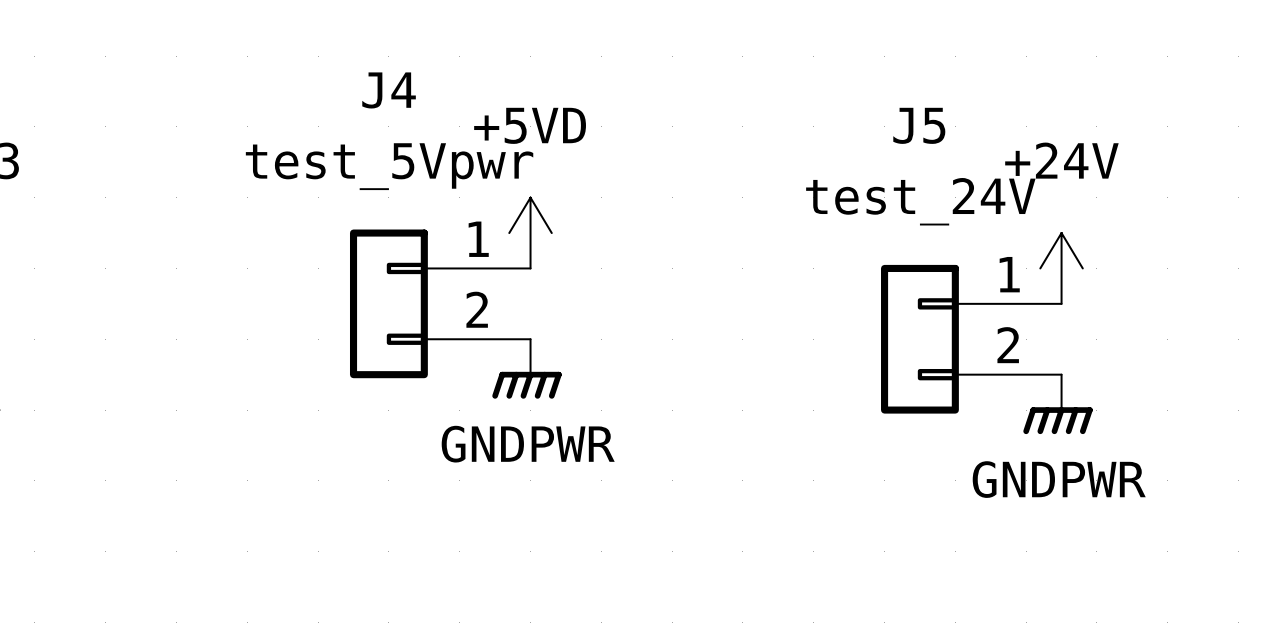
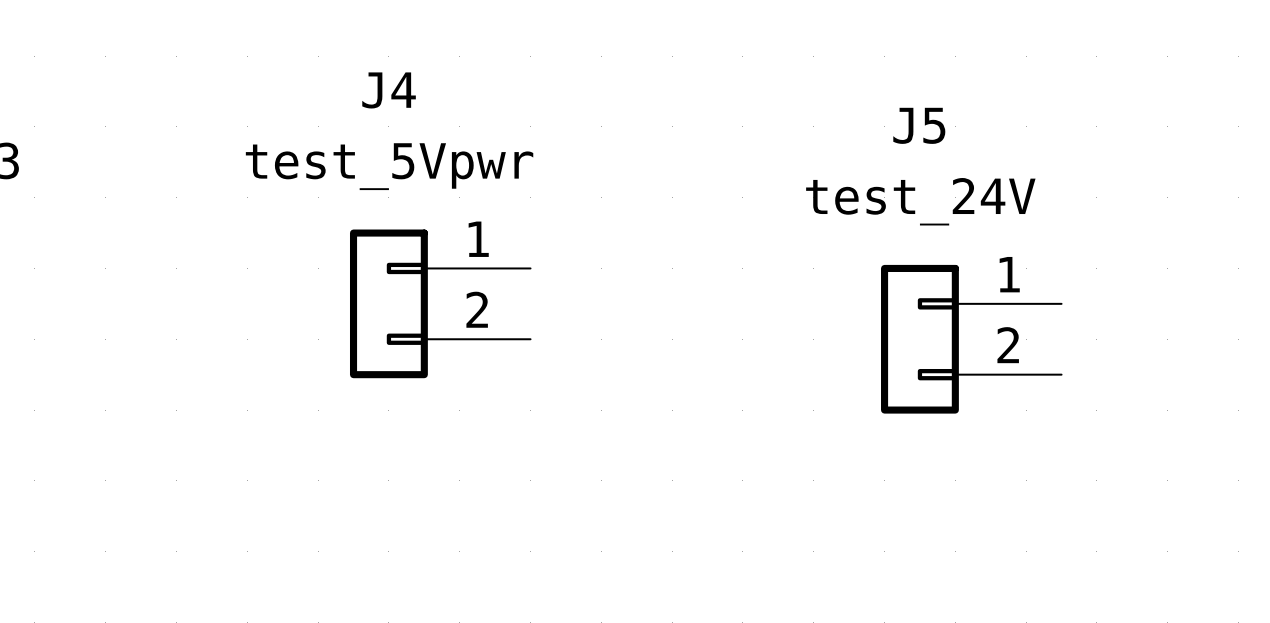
power symbol: +5VD (530, 233) -> none
power symbol: +24V (1061, 268) -> none
power symbol: GNDPWR (526, 368) -> none
power symbol: GNDPWR (1058, 404) -> none

